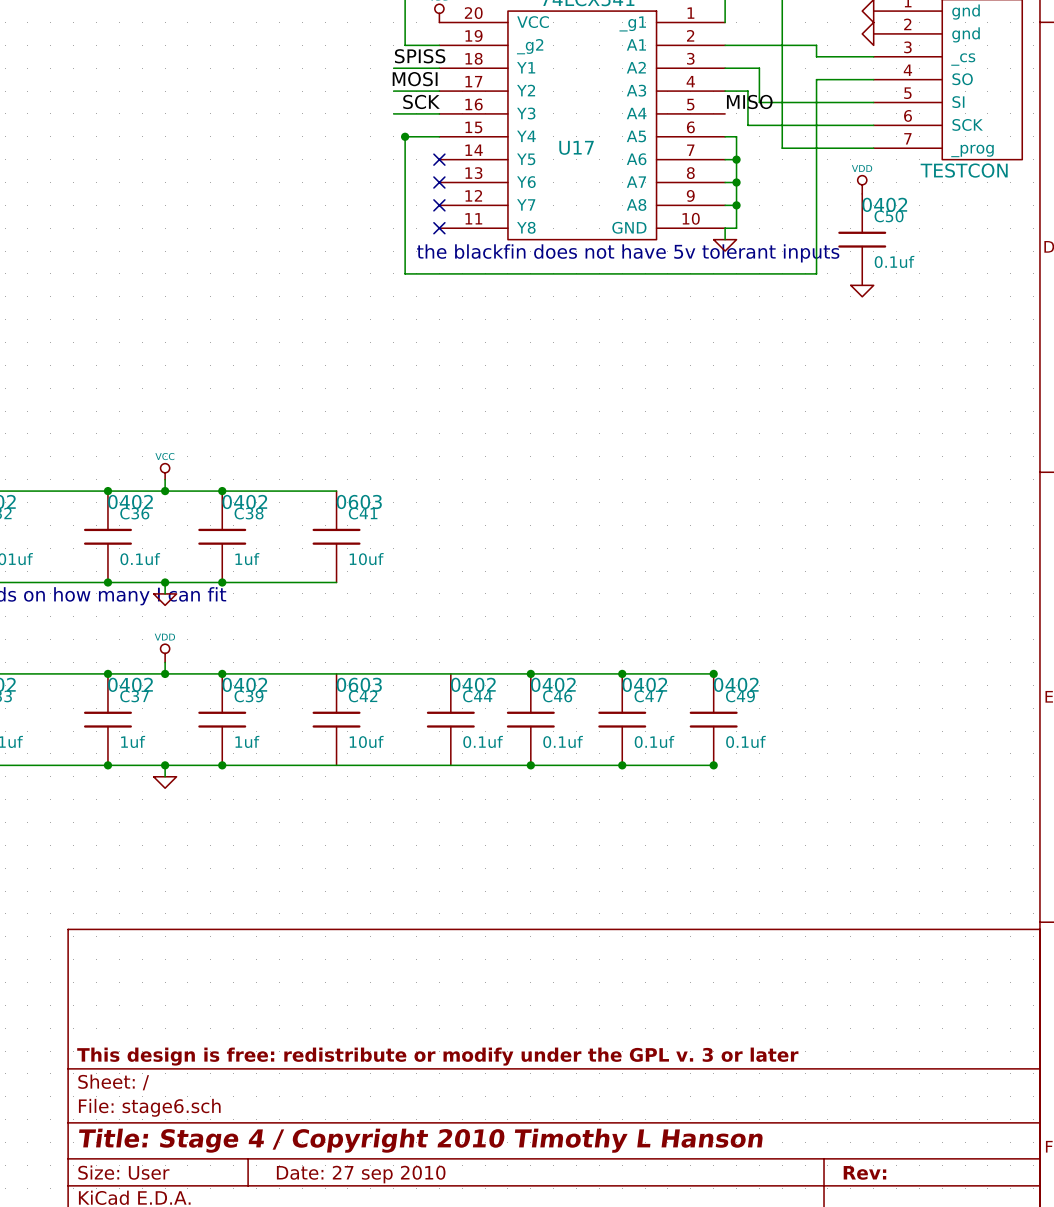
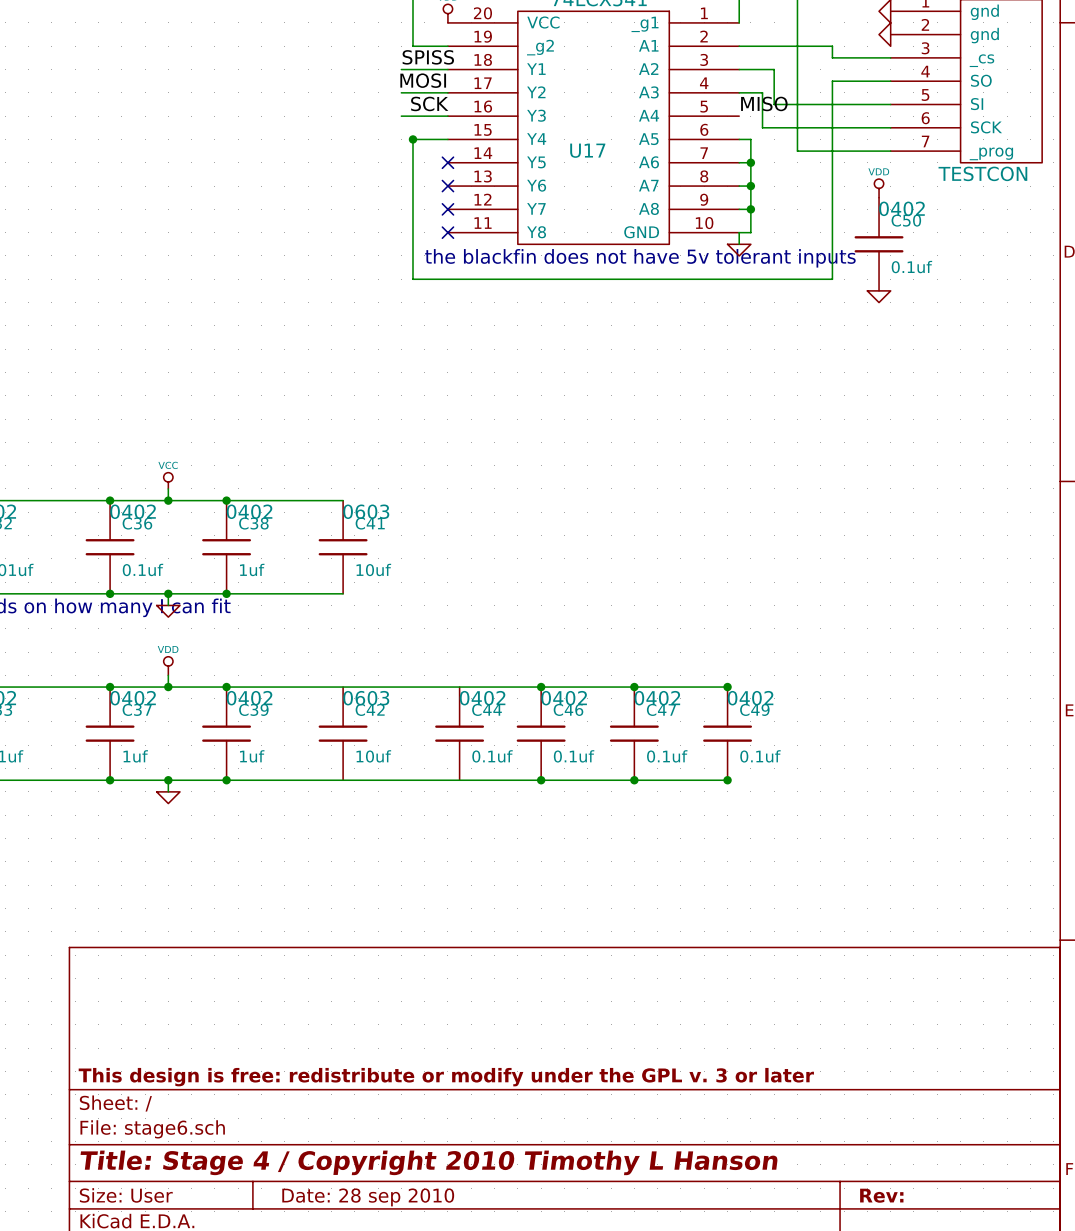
title block: Date: 27 sep 2010 (361, 1174) -> Date: 28 sep 2010 (368, 1197)

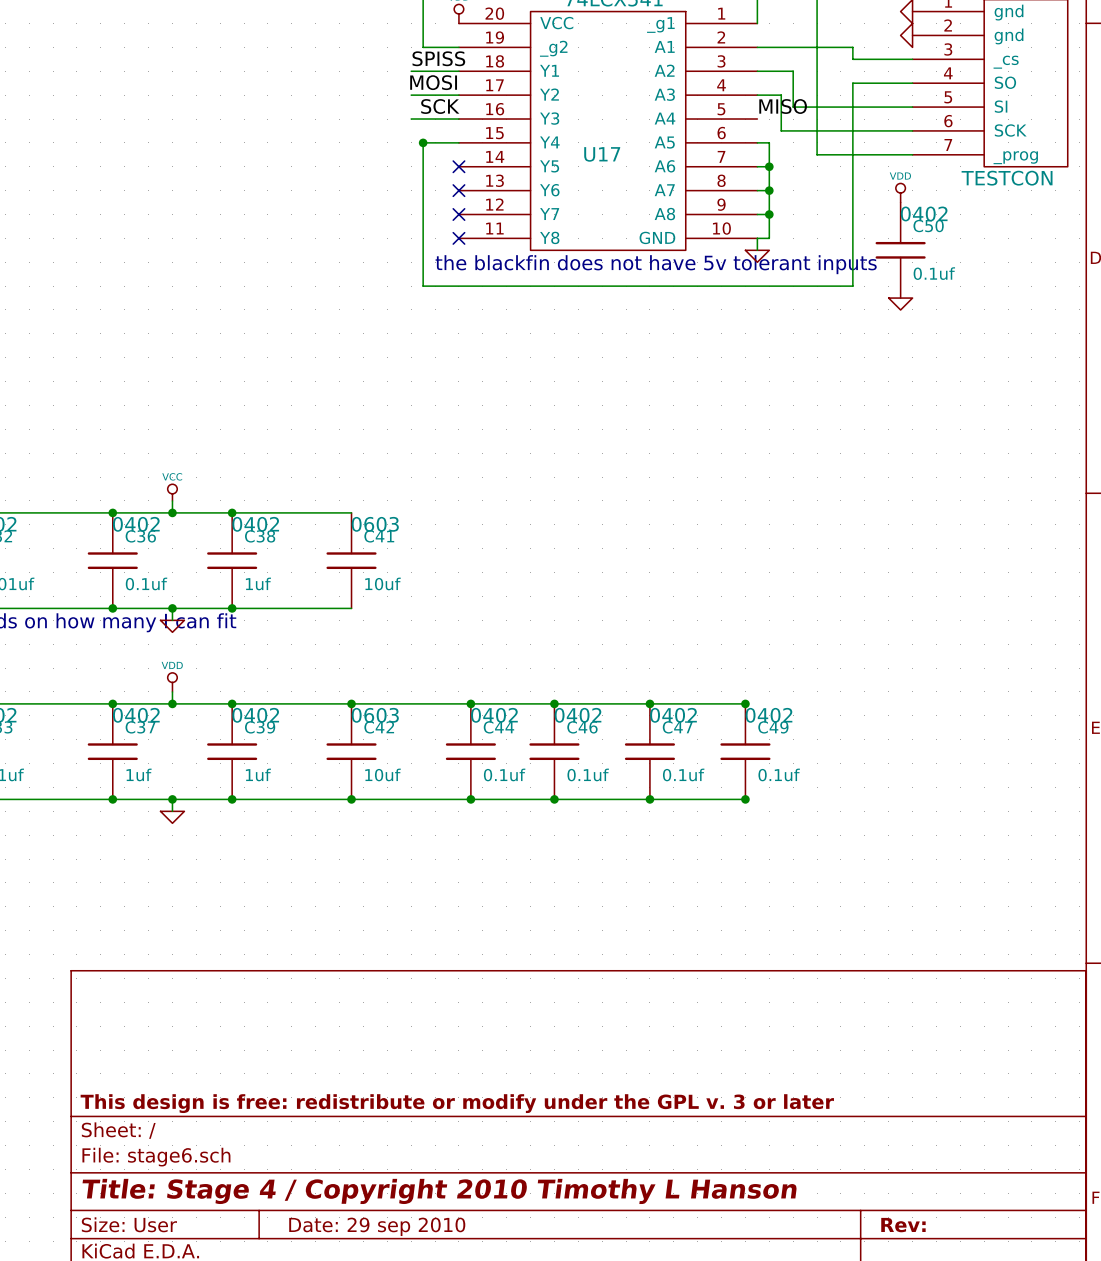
junction: none -> (351, 703)
junction: none -> (470, 703)
junction: none -> (351, 799)
junction: none -> (470, 799)
title block: Date: 28 sep 2010 (368, 1197) -> Date: 29 sep 2010 (377, 1226)

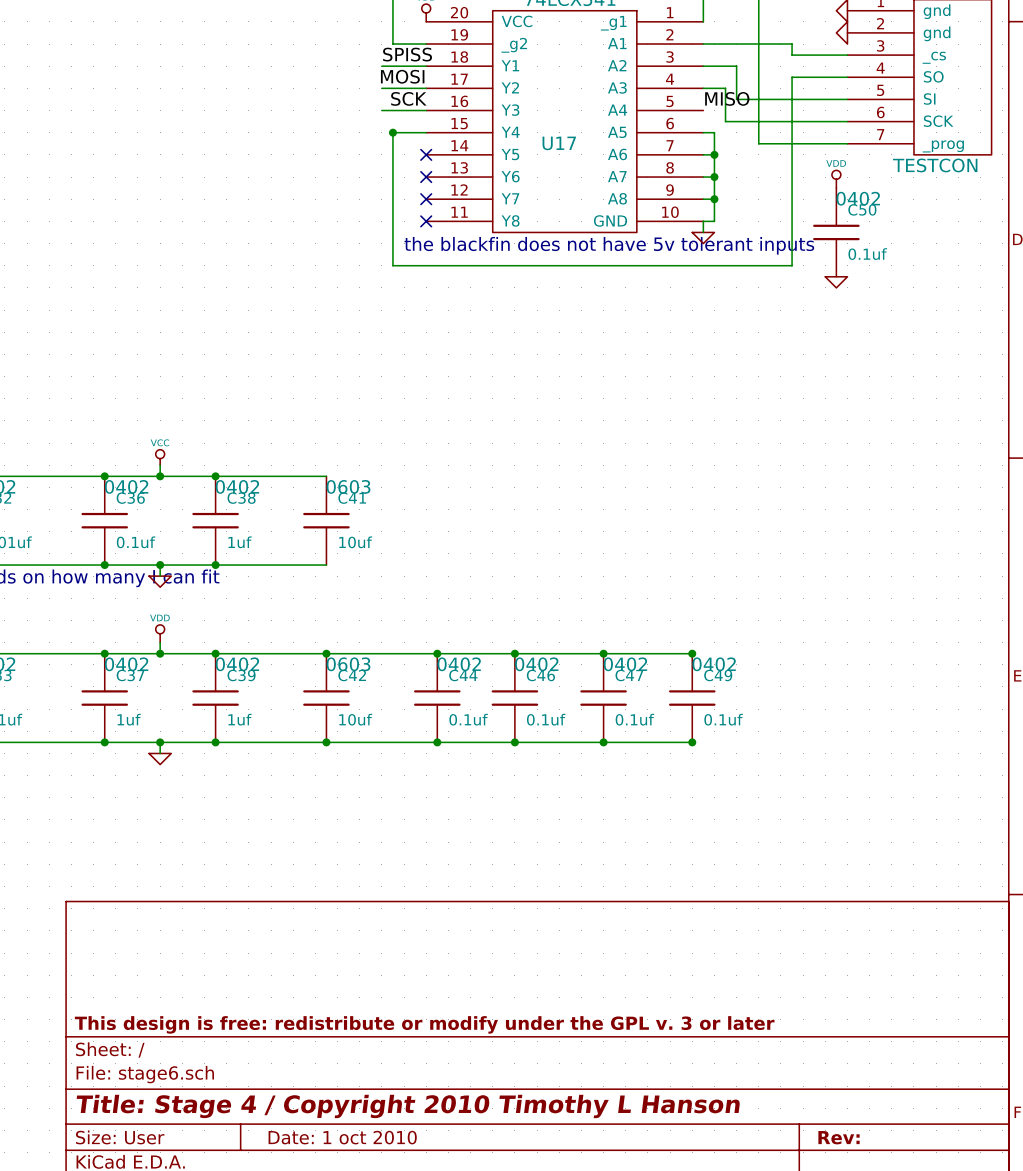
title block: Date: 29 sep 2010 (377, 1226) -> Date: 1 oct 2010 (342, 1137)

